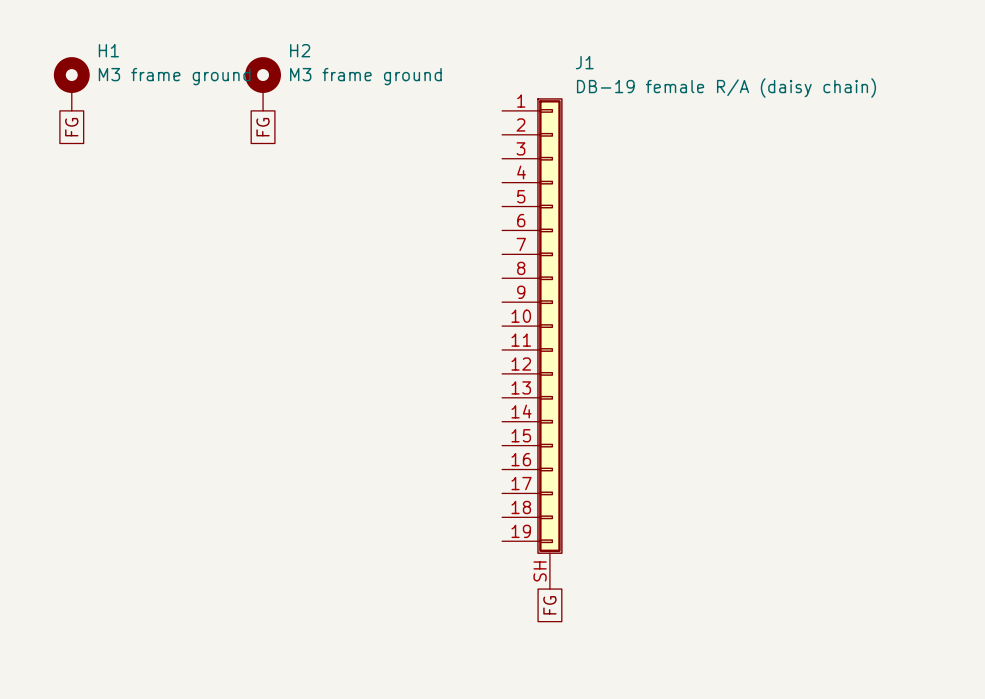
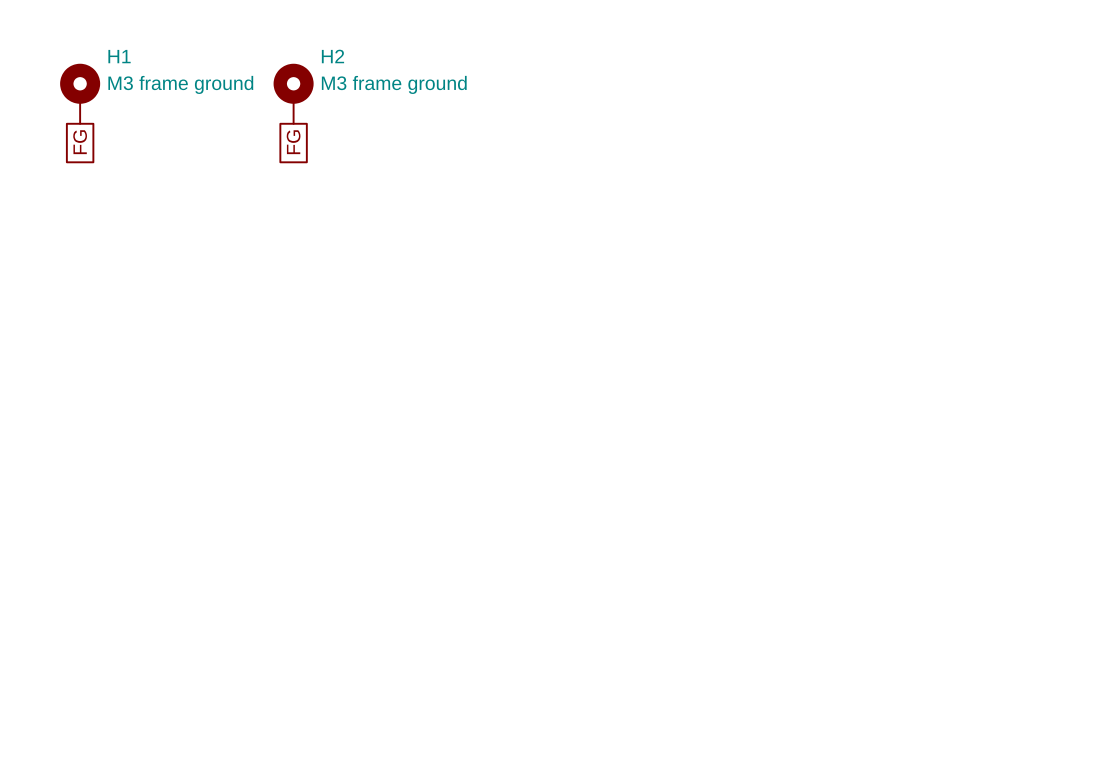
J1: DB-19 female R/A (daisy chain) (532, 343) -> none
global label: FG (549, 605) -> none

